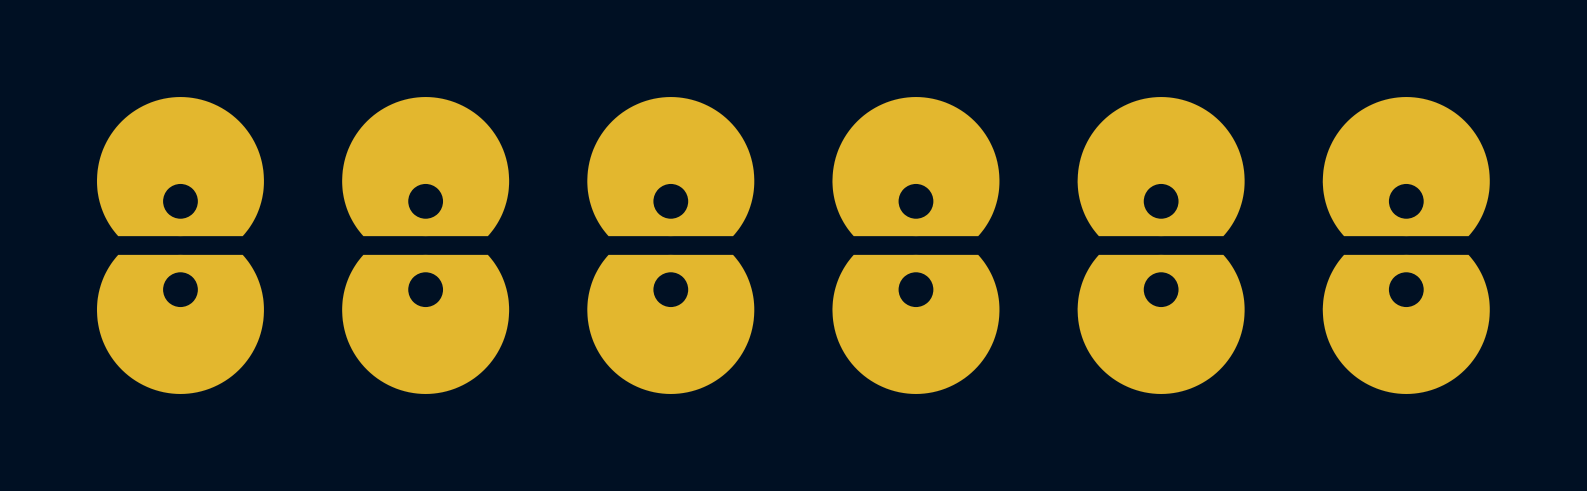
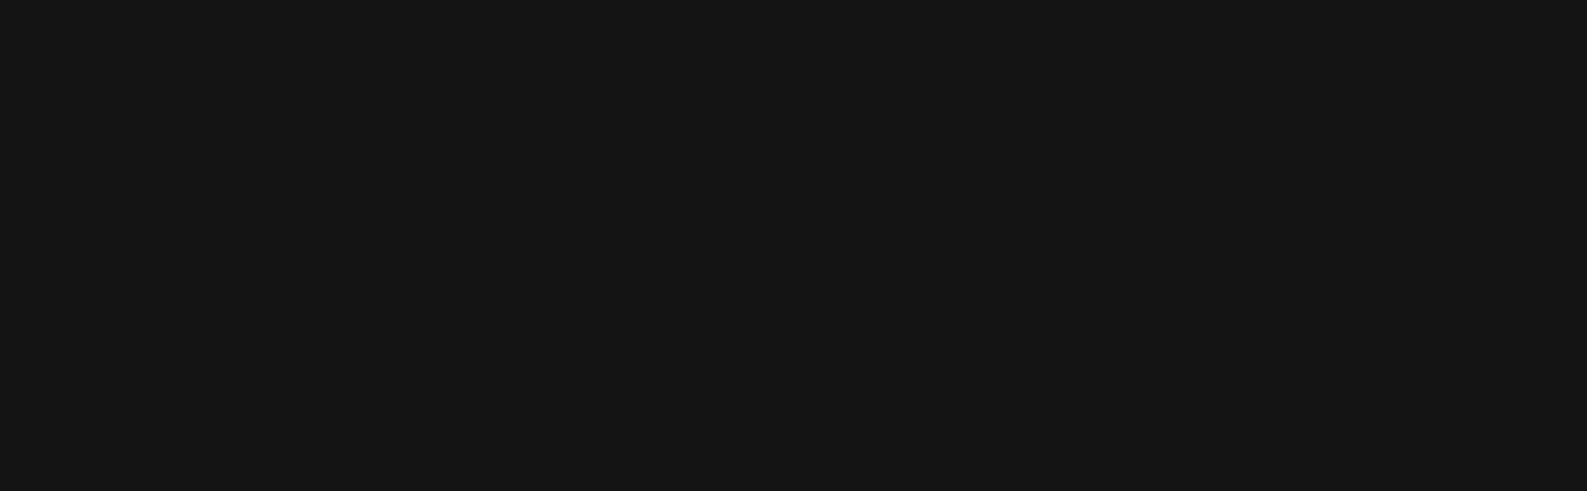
part: (180, 245) -> none
part: (425, 245) -> none
part: (670, 245) -> none
part: (915, 245) -> none
part: (1161, 245) -> none
part: (1406, 245) -> none

